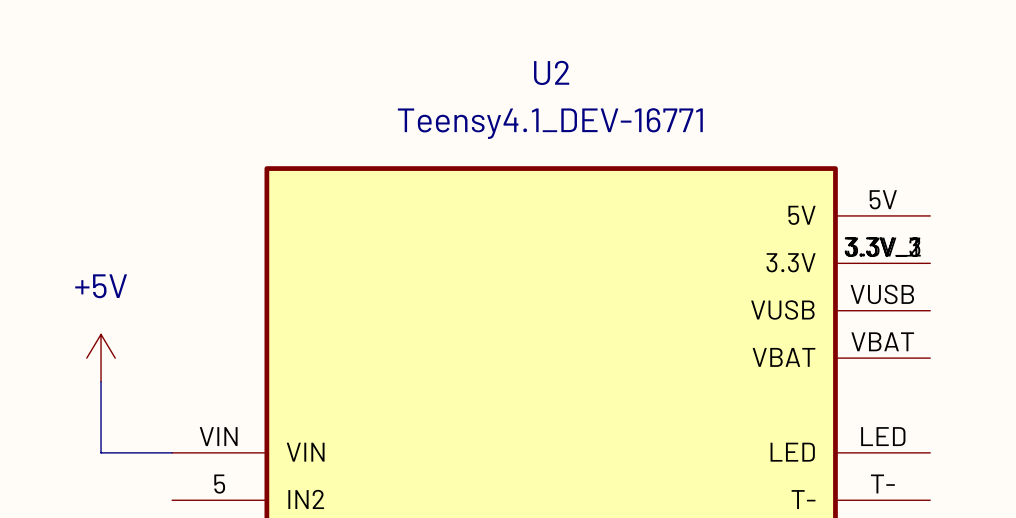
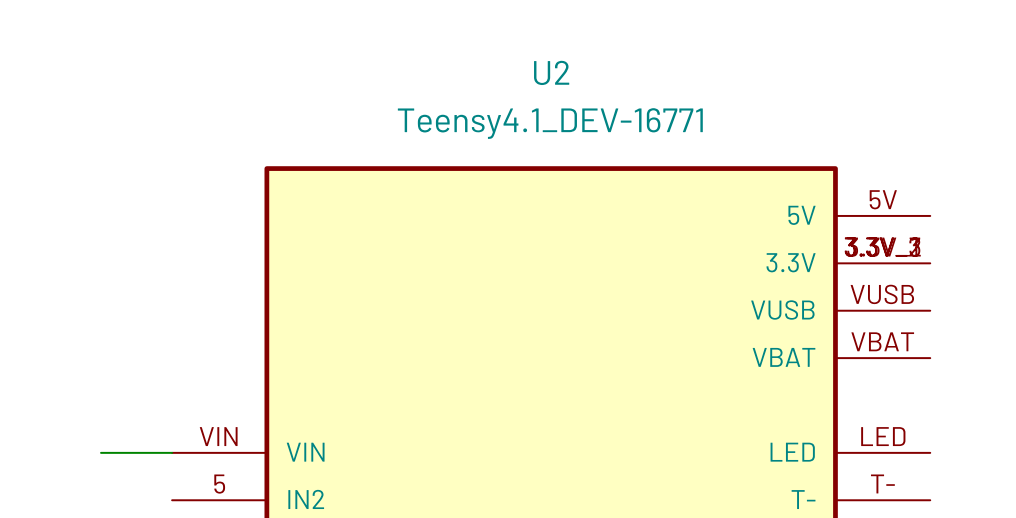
power symbol: +5V (101, 358) -> none
wire: (101, 381) (101, 452) -> none

